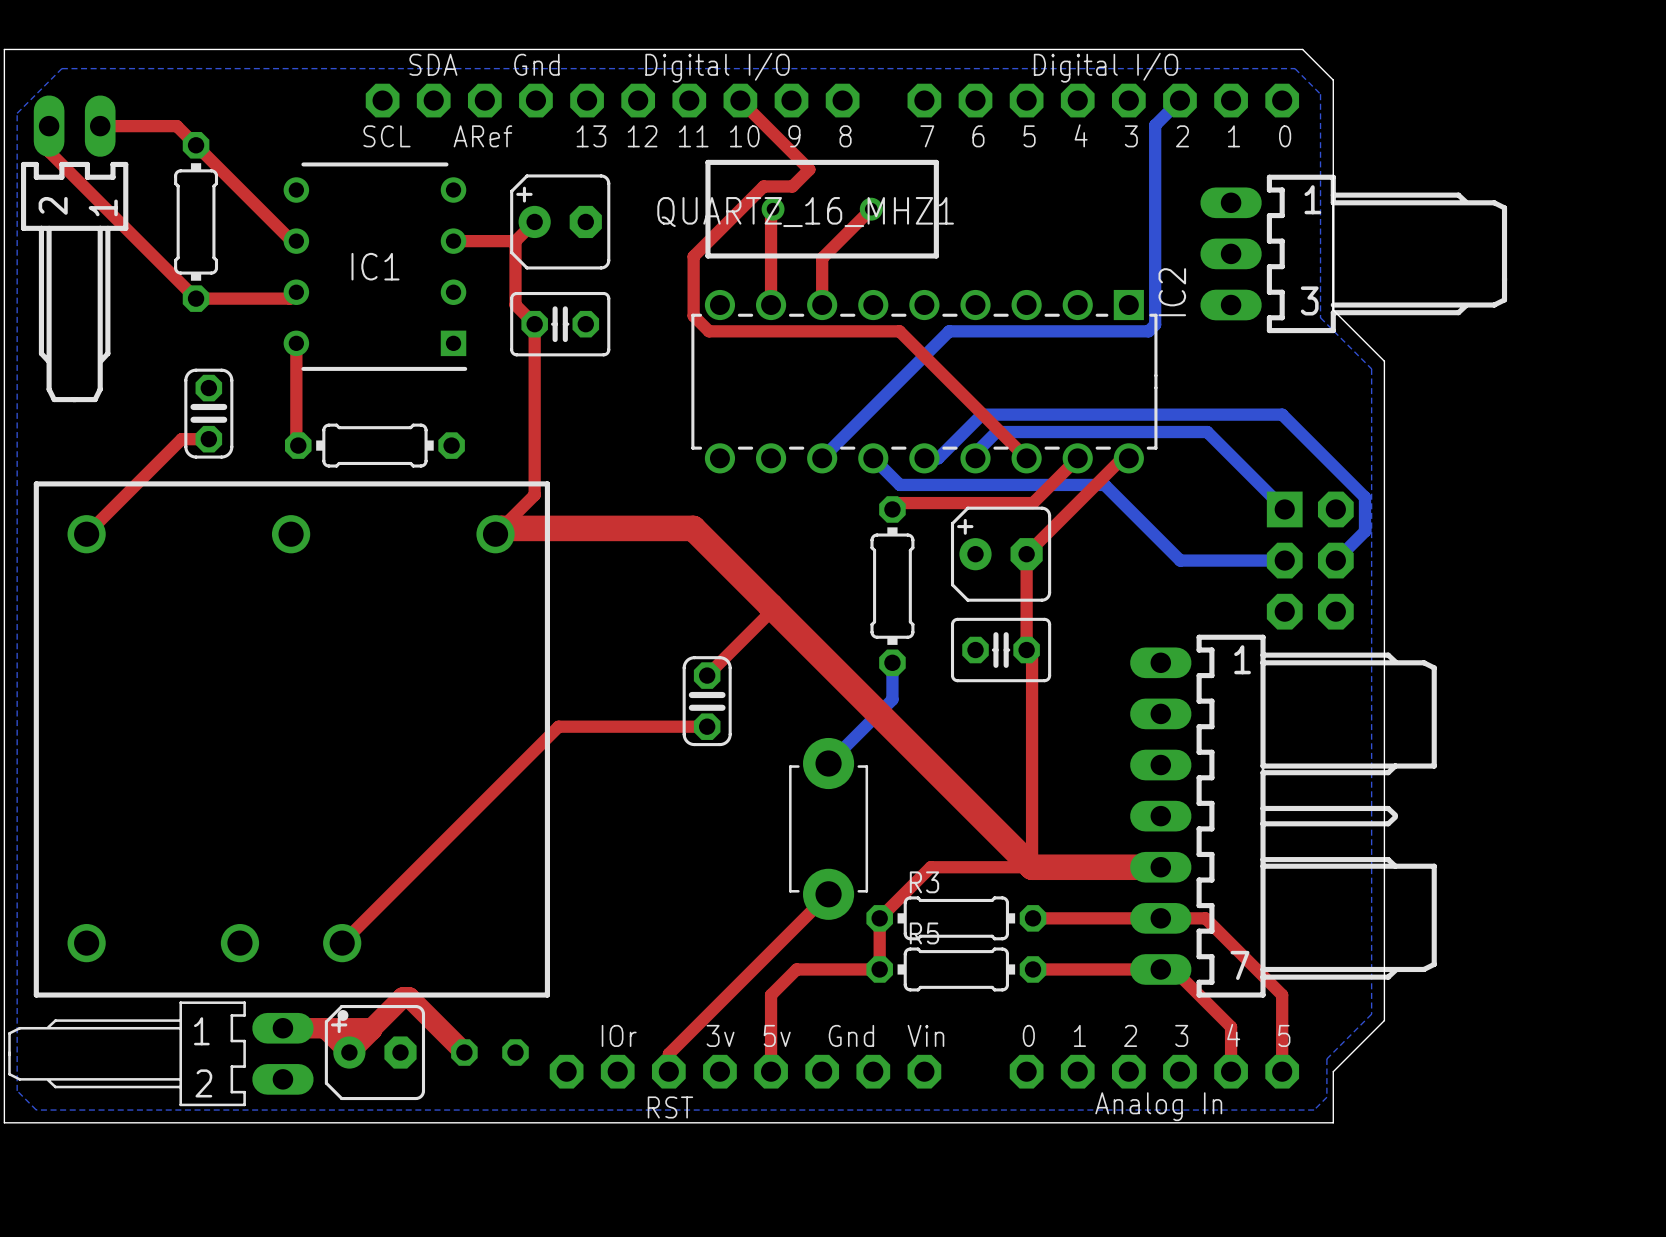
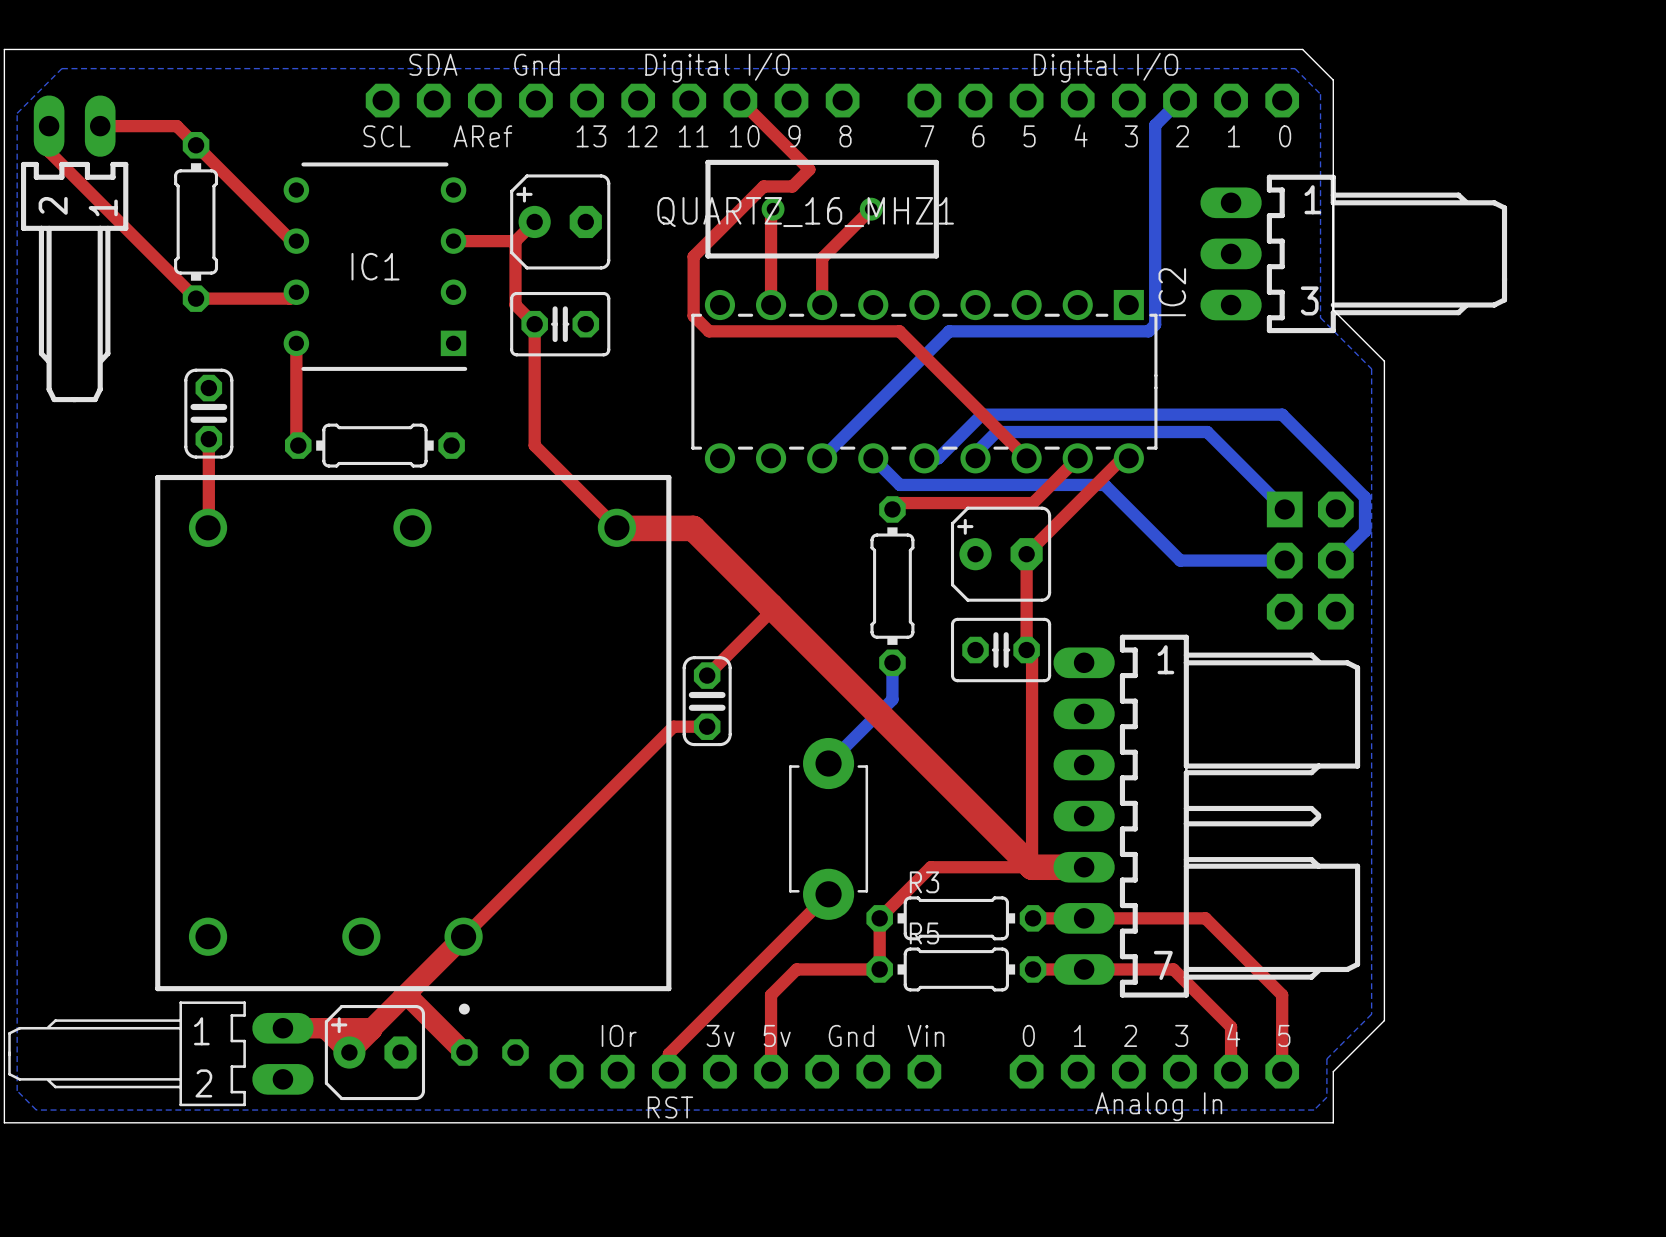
top track: (208, 439) (181, 439) (86, 534) -> (208, 439) (208, 527)
top track: (534, 445) (534, 495) (495, 534) (501, 528) (617, 528) -> (534, 445) (617, 528)
top track: (673, 726) (558, 726) (342, 943) -> (673, 726) (402, 997)
part position: (291, 751) -> (413, 744)
part position: (1283, 816) -> (1206, 816)
top track: (1084, 867) (1160, 867) -> none

